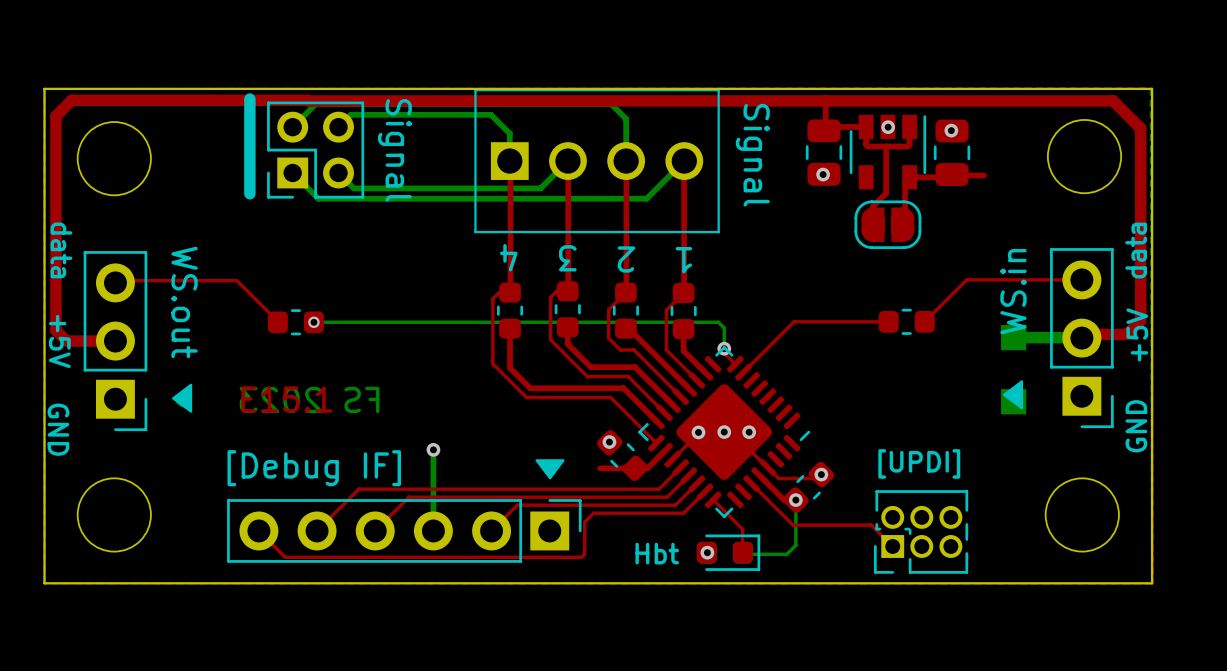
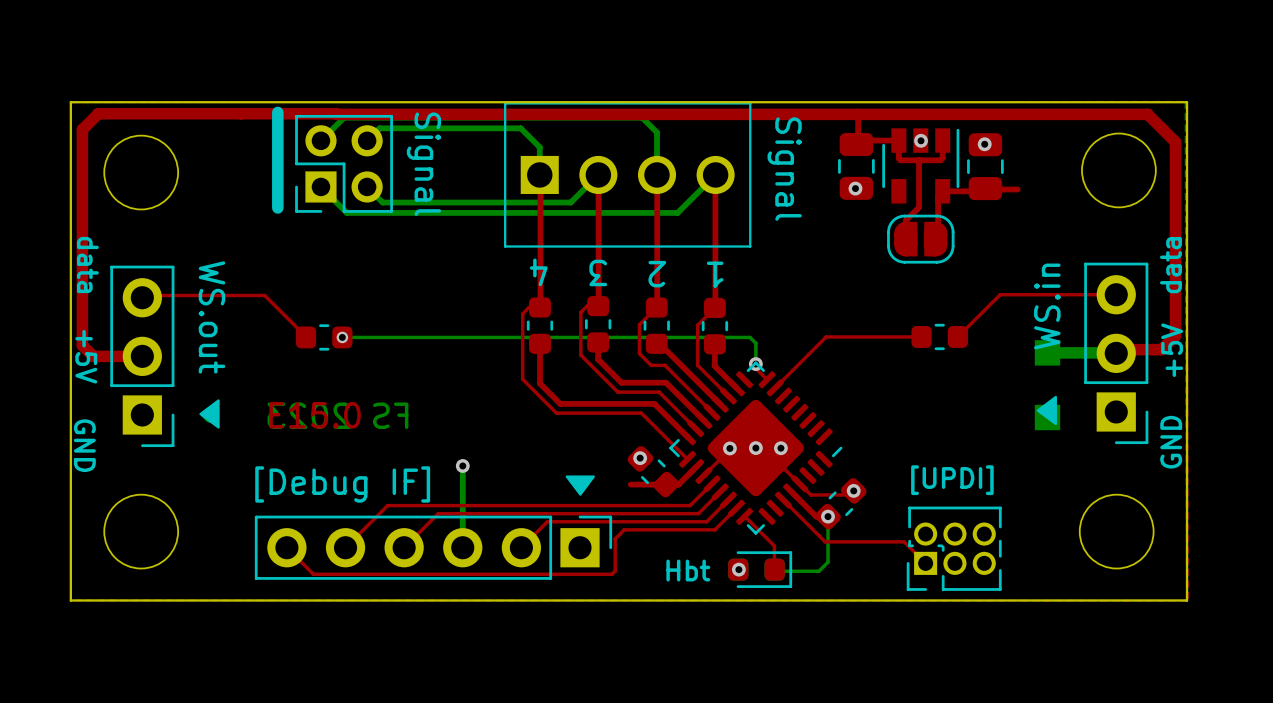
text: E15.1 (286, 399) -> E15.0 (315, 415)

